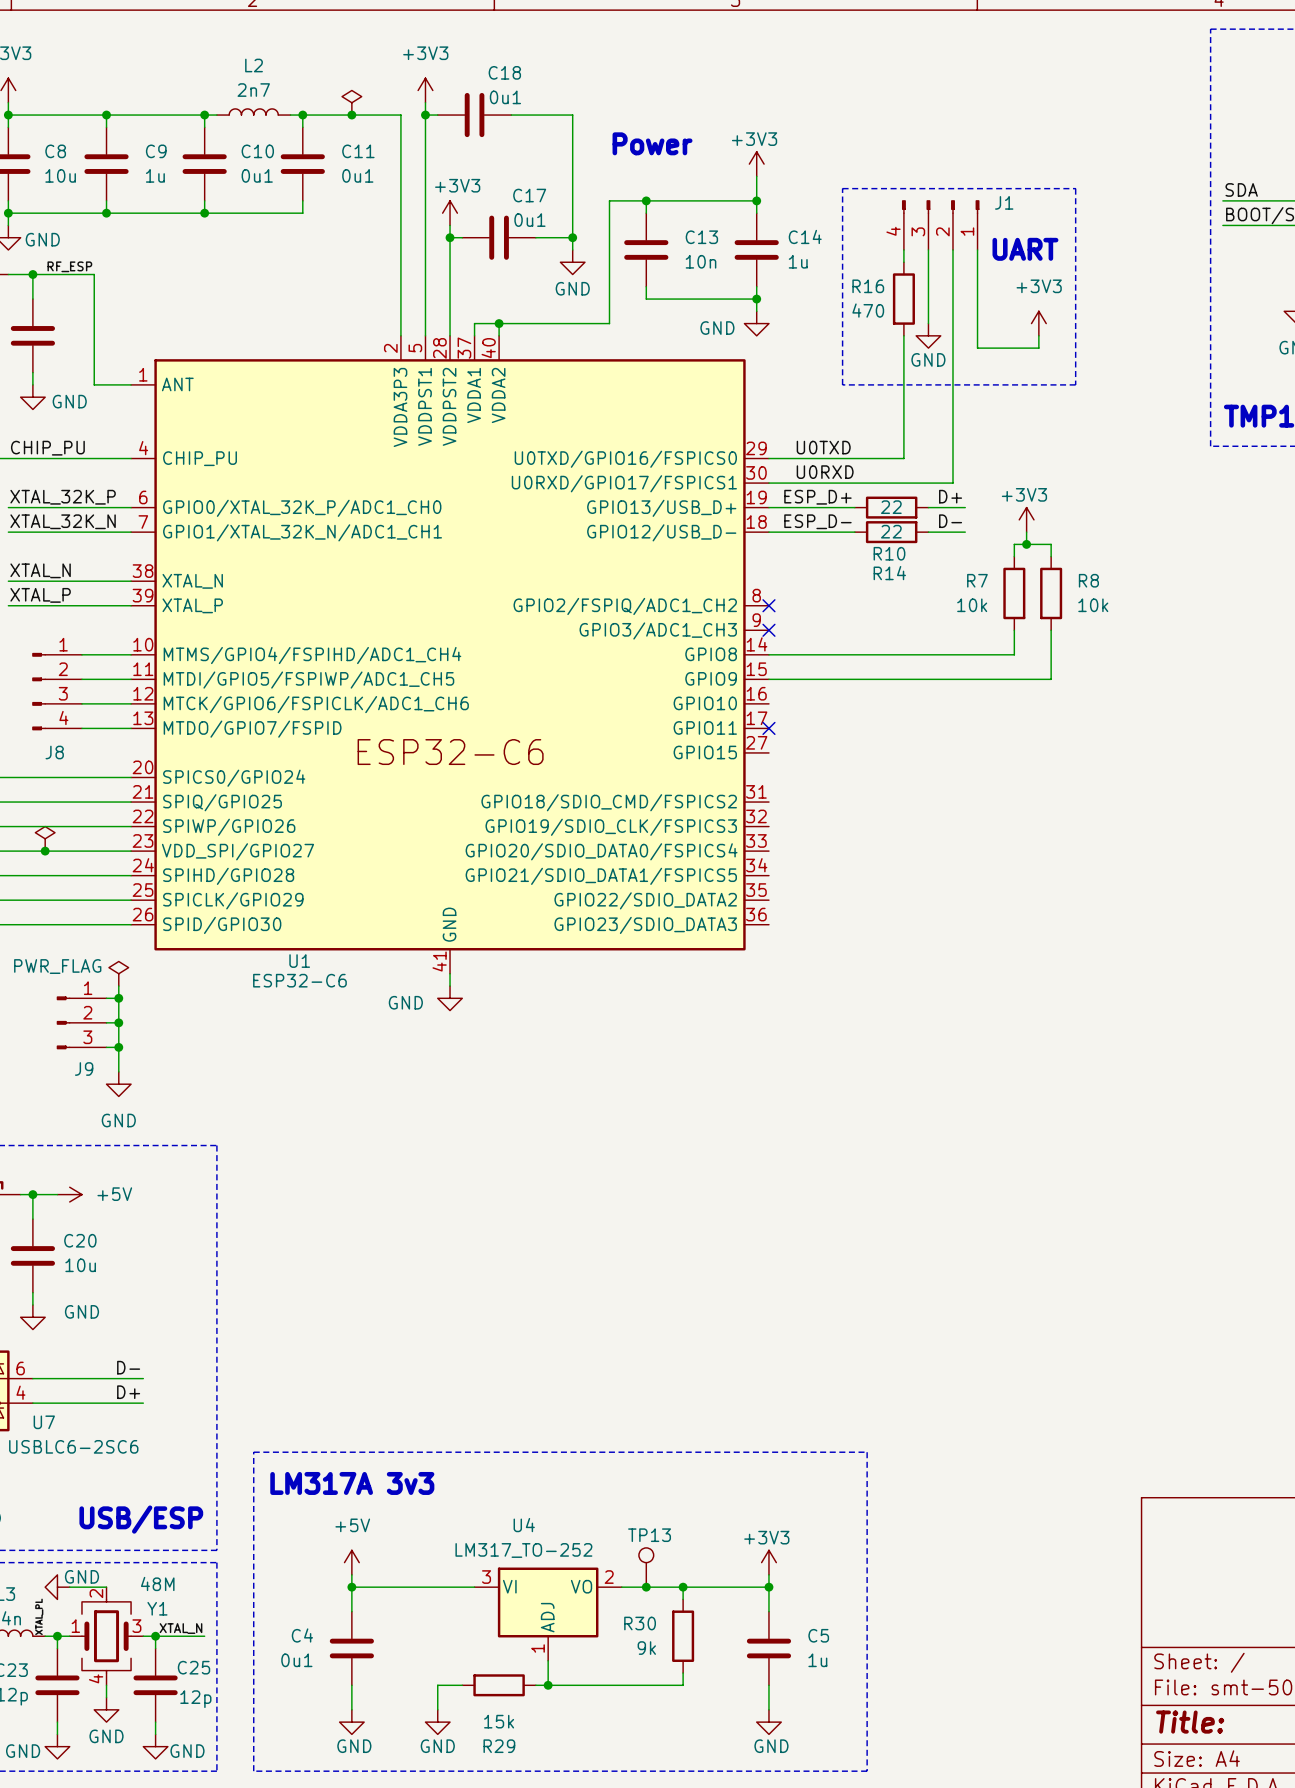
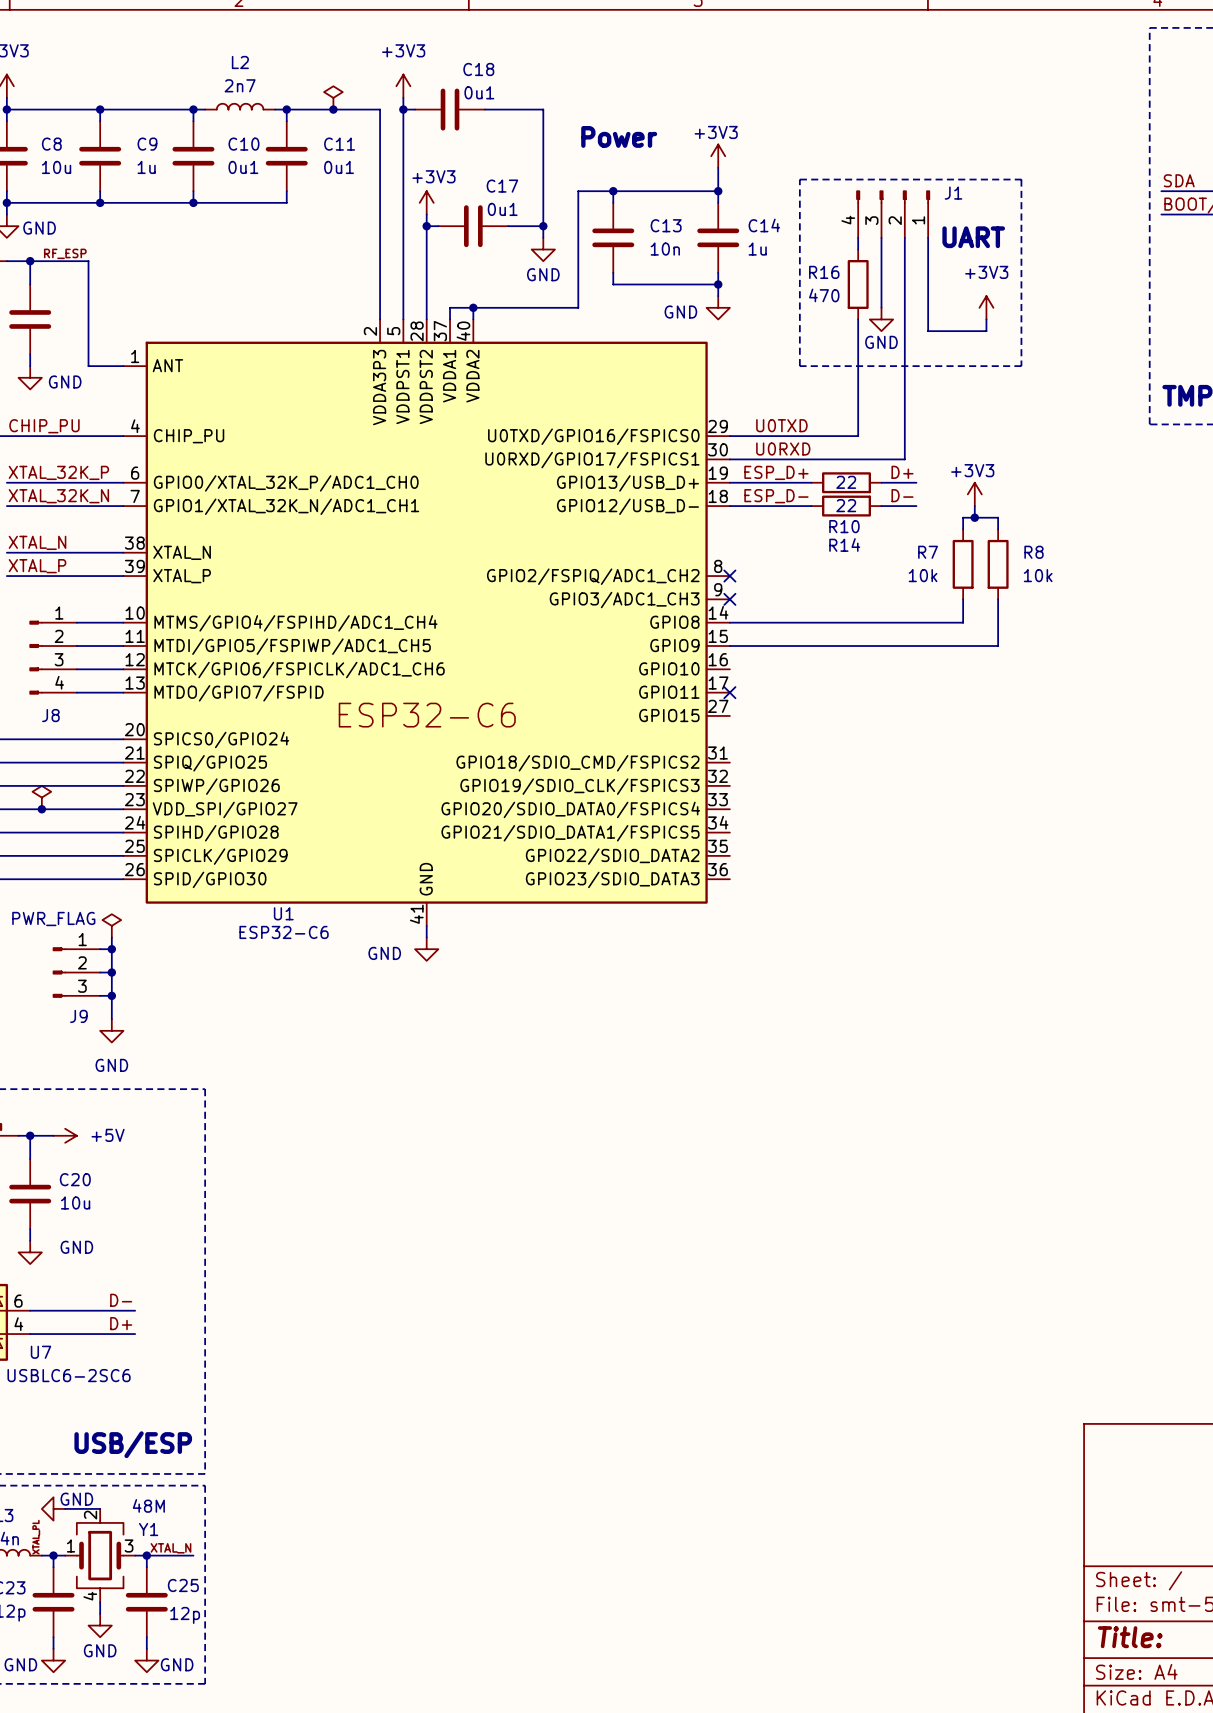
line: (253, 1452) (867, 1452) (867, 1771) (253, 1771) (253, 1452) -> none
text: LM317A 3v3 (352, 1483) -> none
power symbol: +5V (351, 1562) -> none
power symbol: +3V3 (768, 1562) -> none
TP13: (646, 1567) -> none
wire: (351, 1574) (351, 1611) -> none
wire: (768, 1574) (768, 1611) -> none
wire: (351, 1587) (474, 1587) -> none
junction: (351, 1587) -> none
wire: (621, 1587) (768, 1587) -> none
junction: (646, 1587) -> none
wire: (683, 1587) (683, 1599) -> none
junction: (683, 1587) -> none
junction: (768, 1587) -> none
U4: LM317_TO-252 (548, 1614) -> none
R30: 9k (683, 1636) -> none
C4: 0u1 (351, 1648) -> none
C5: 1u (768, 1648) -> none
wire: (548, 1660) (548, 1685) -> none
wire: (683, 1673) (683, 1685) (535, 1685) -> none
wire: (351, 1685) (351, 1709) -> none
wire: (462, 1685) (437, 1685) (437, 1709) -> none
R29: 15k (499, 1685) -> none
junction: (548, 1685) -> none
wire: (768, 1685) (768, 1709) -> none
power symbol: GND (351, 1722) -> none
power symbol: GND (437, 1722) -> none
power symbol: GND (768, 1722) -> none

